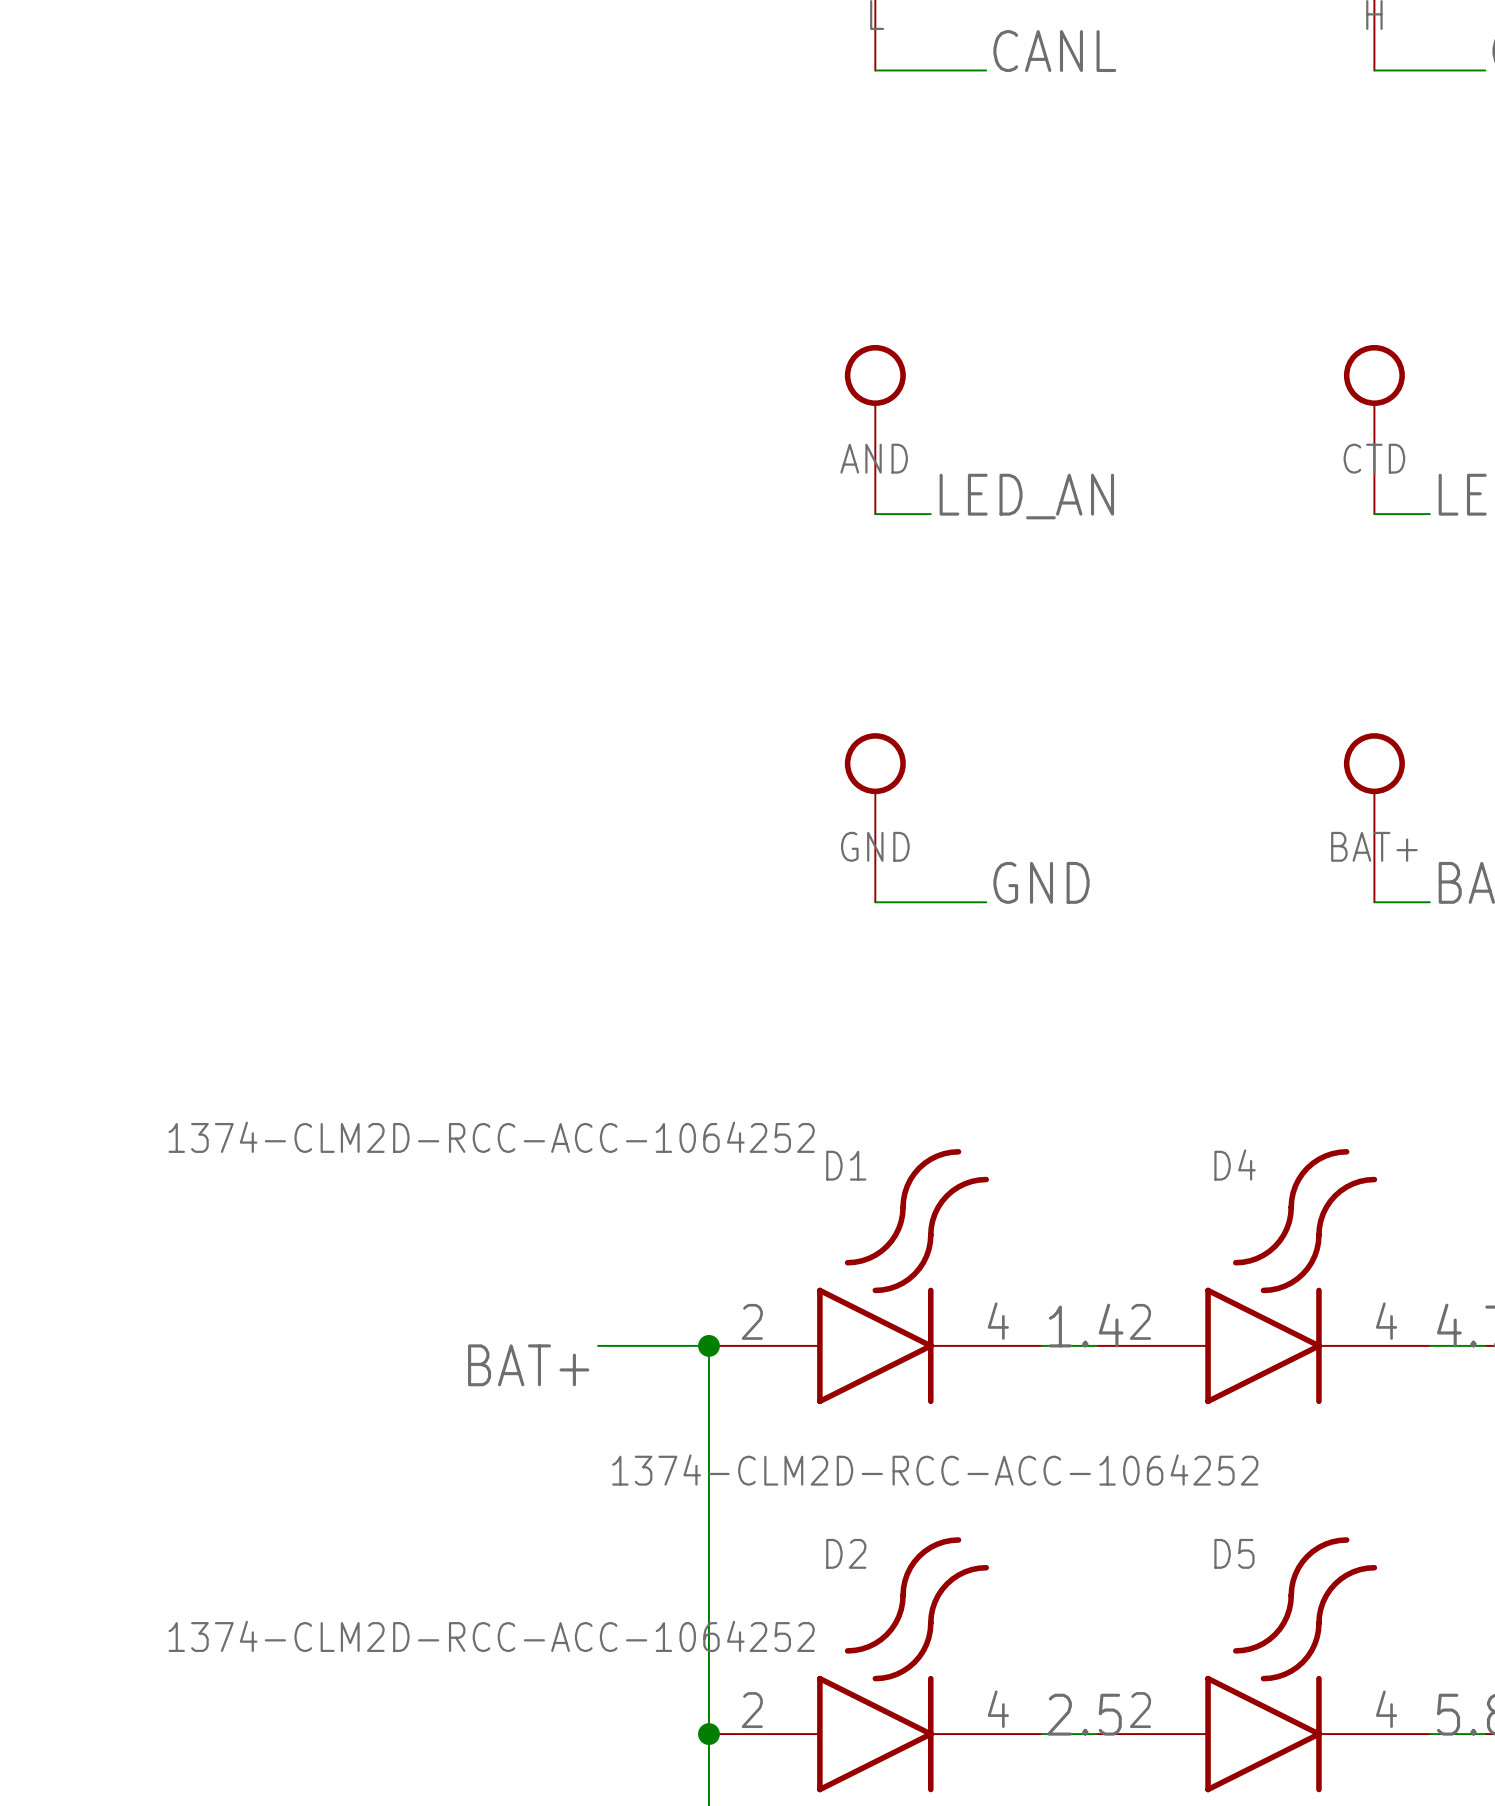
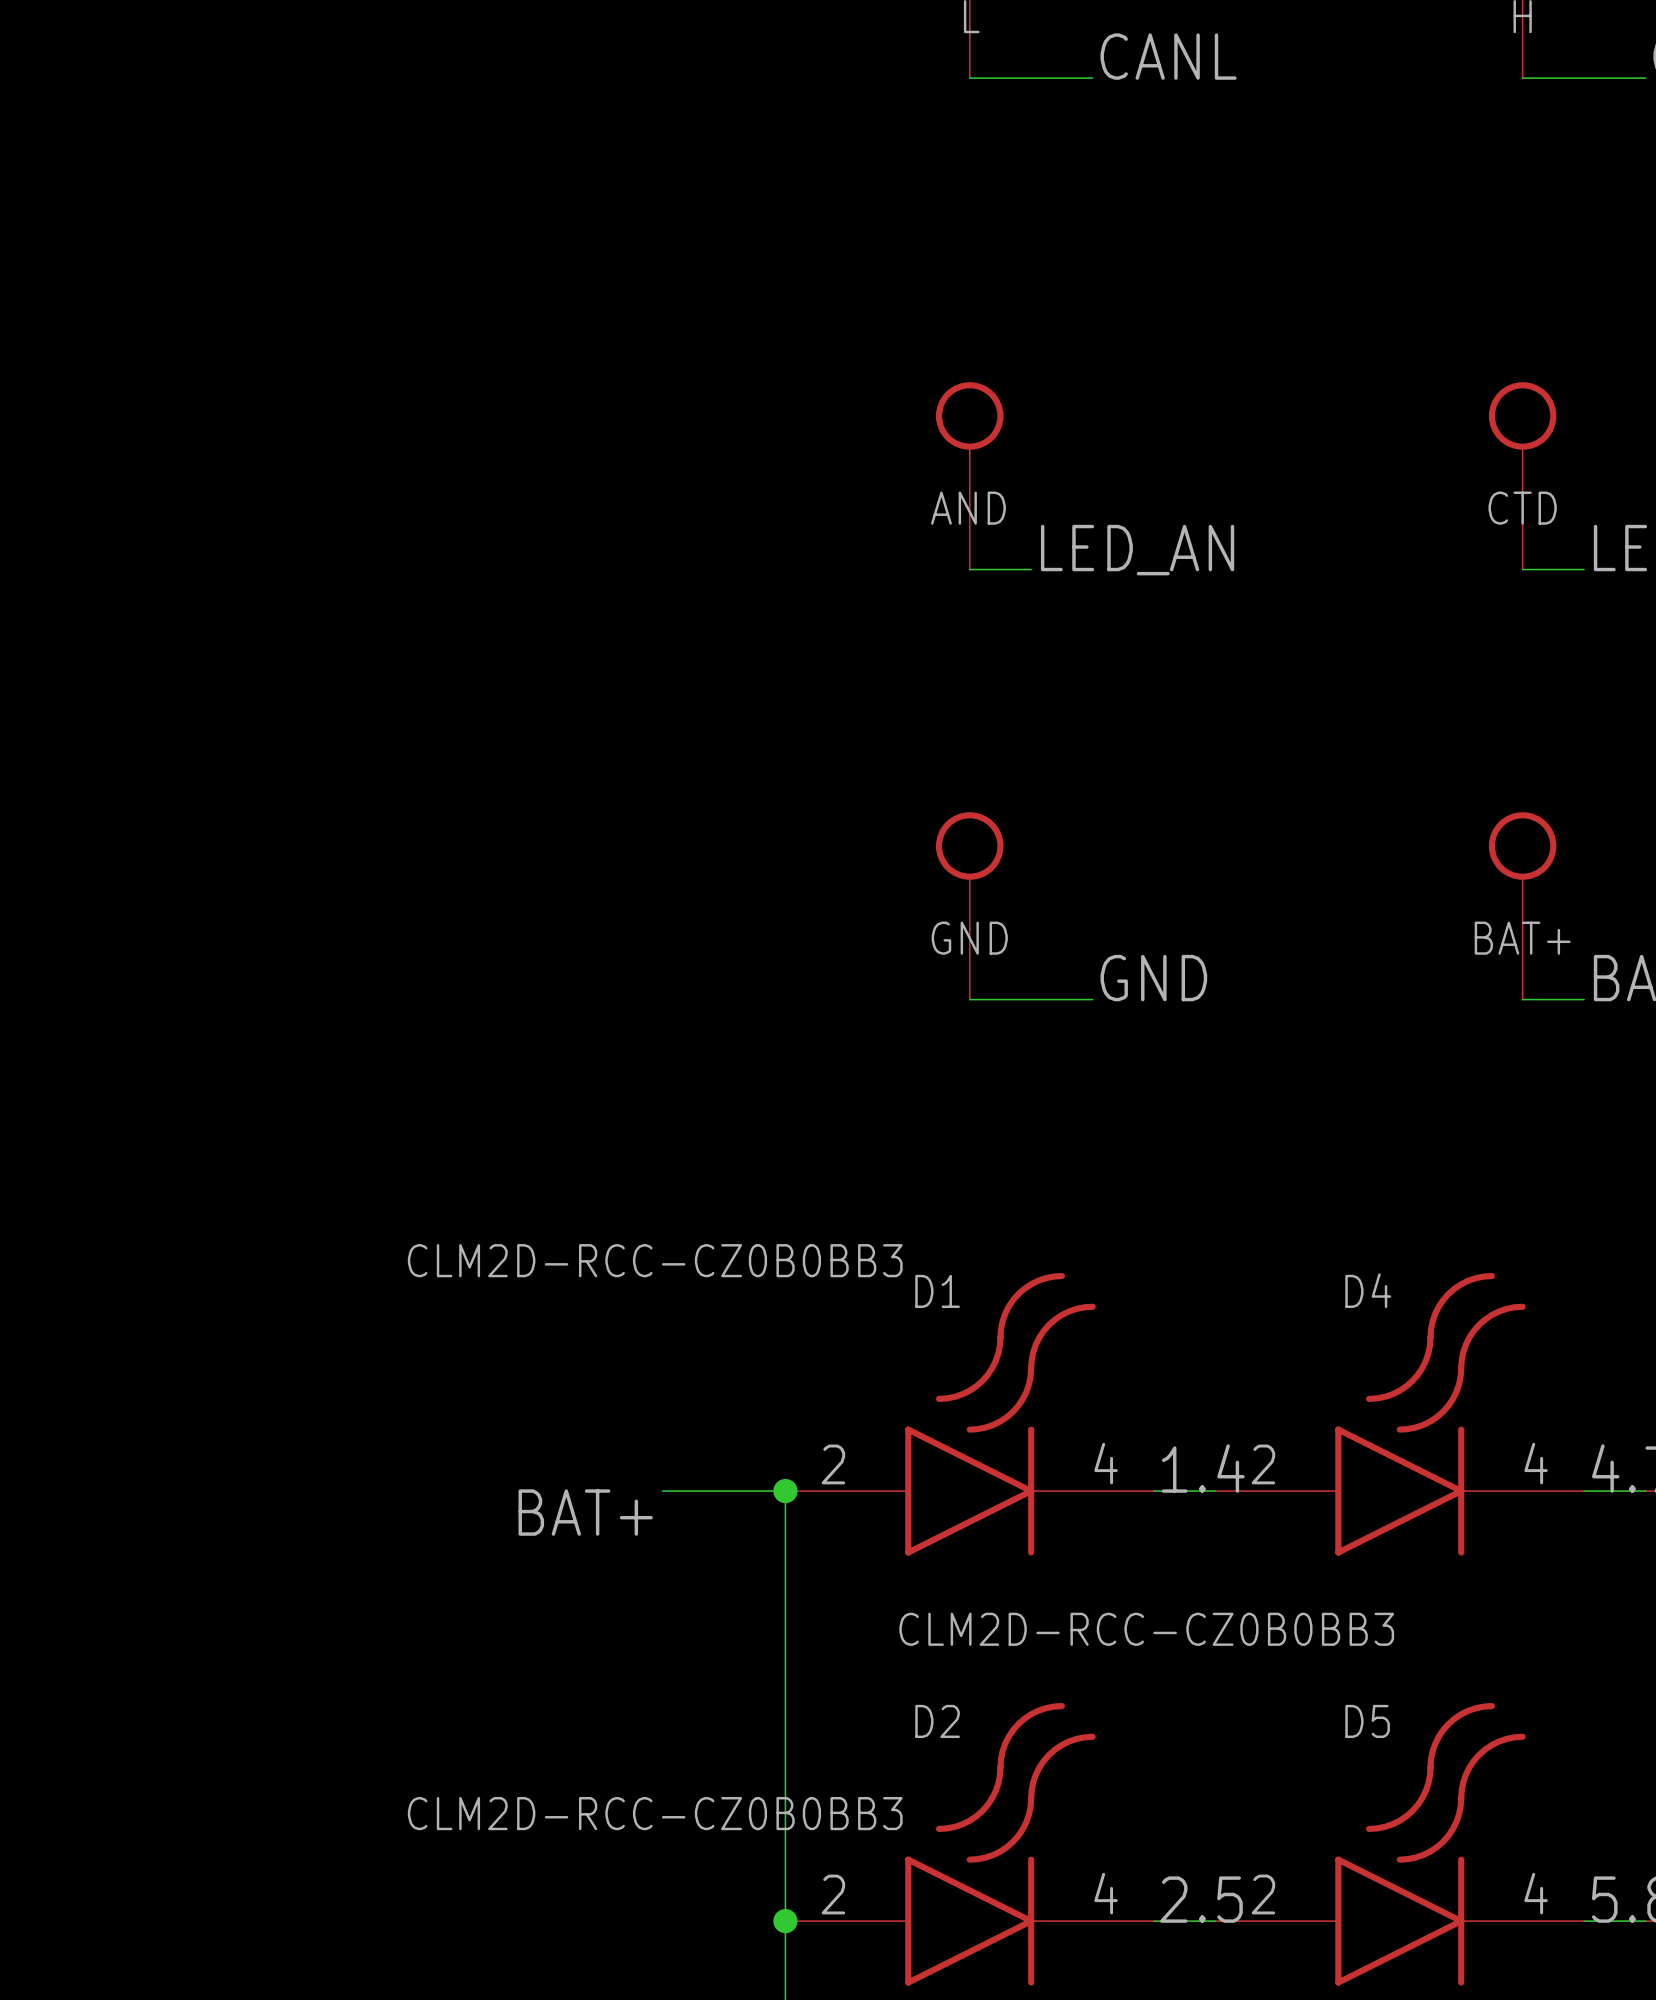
D1 value: 1374-CLM2D-RCC-ACC-1064252 (491, 1137) -> CLM2D-RCC-CZ0B0BB3 (655, 1260)
D4 value: 1374-CLM2D-RCC-ACC-1064252 (935, 1470) -> CLM2D-RCC-CZ0B0BB3 (1146, 1629)
D2 value: 1374-CLM2D-RCC-ACC-1064252 (491, 1636) -> CLM2D-RCC-CZ0B0BB3 (655, 1813)

